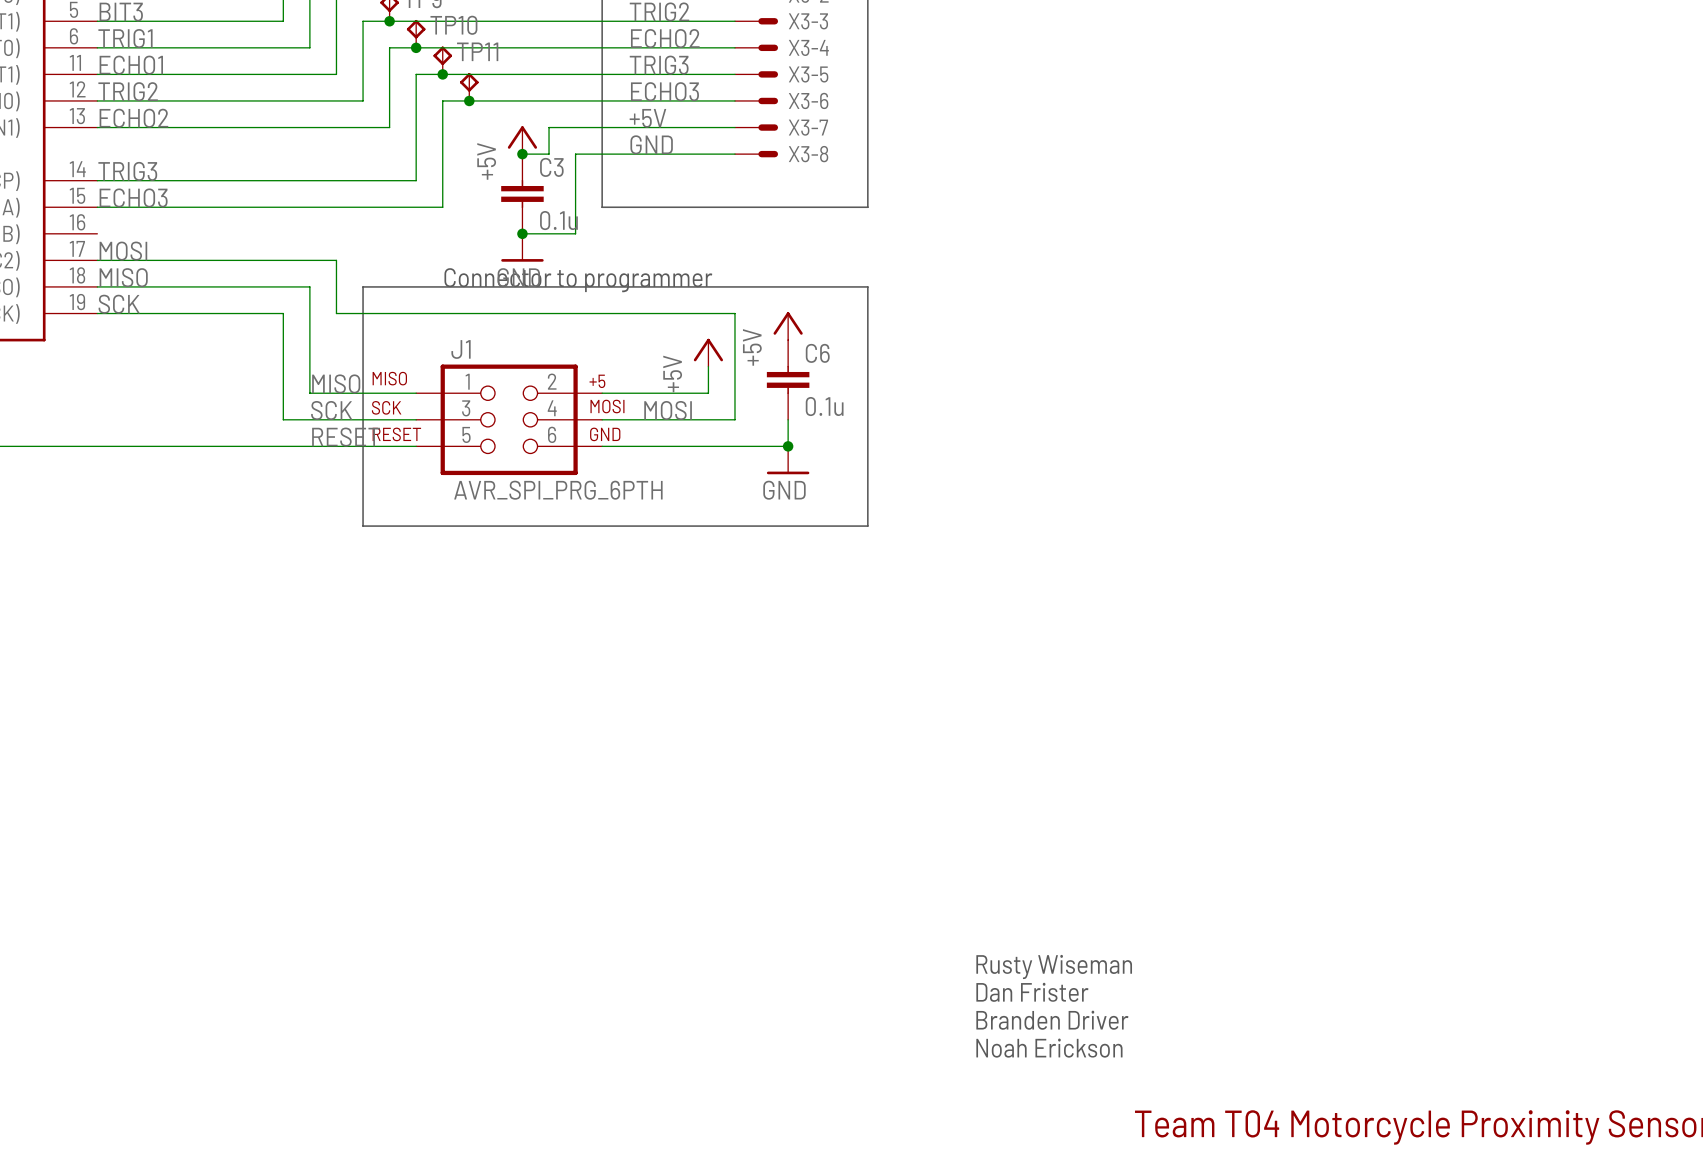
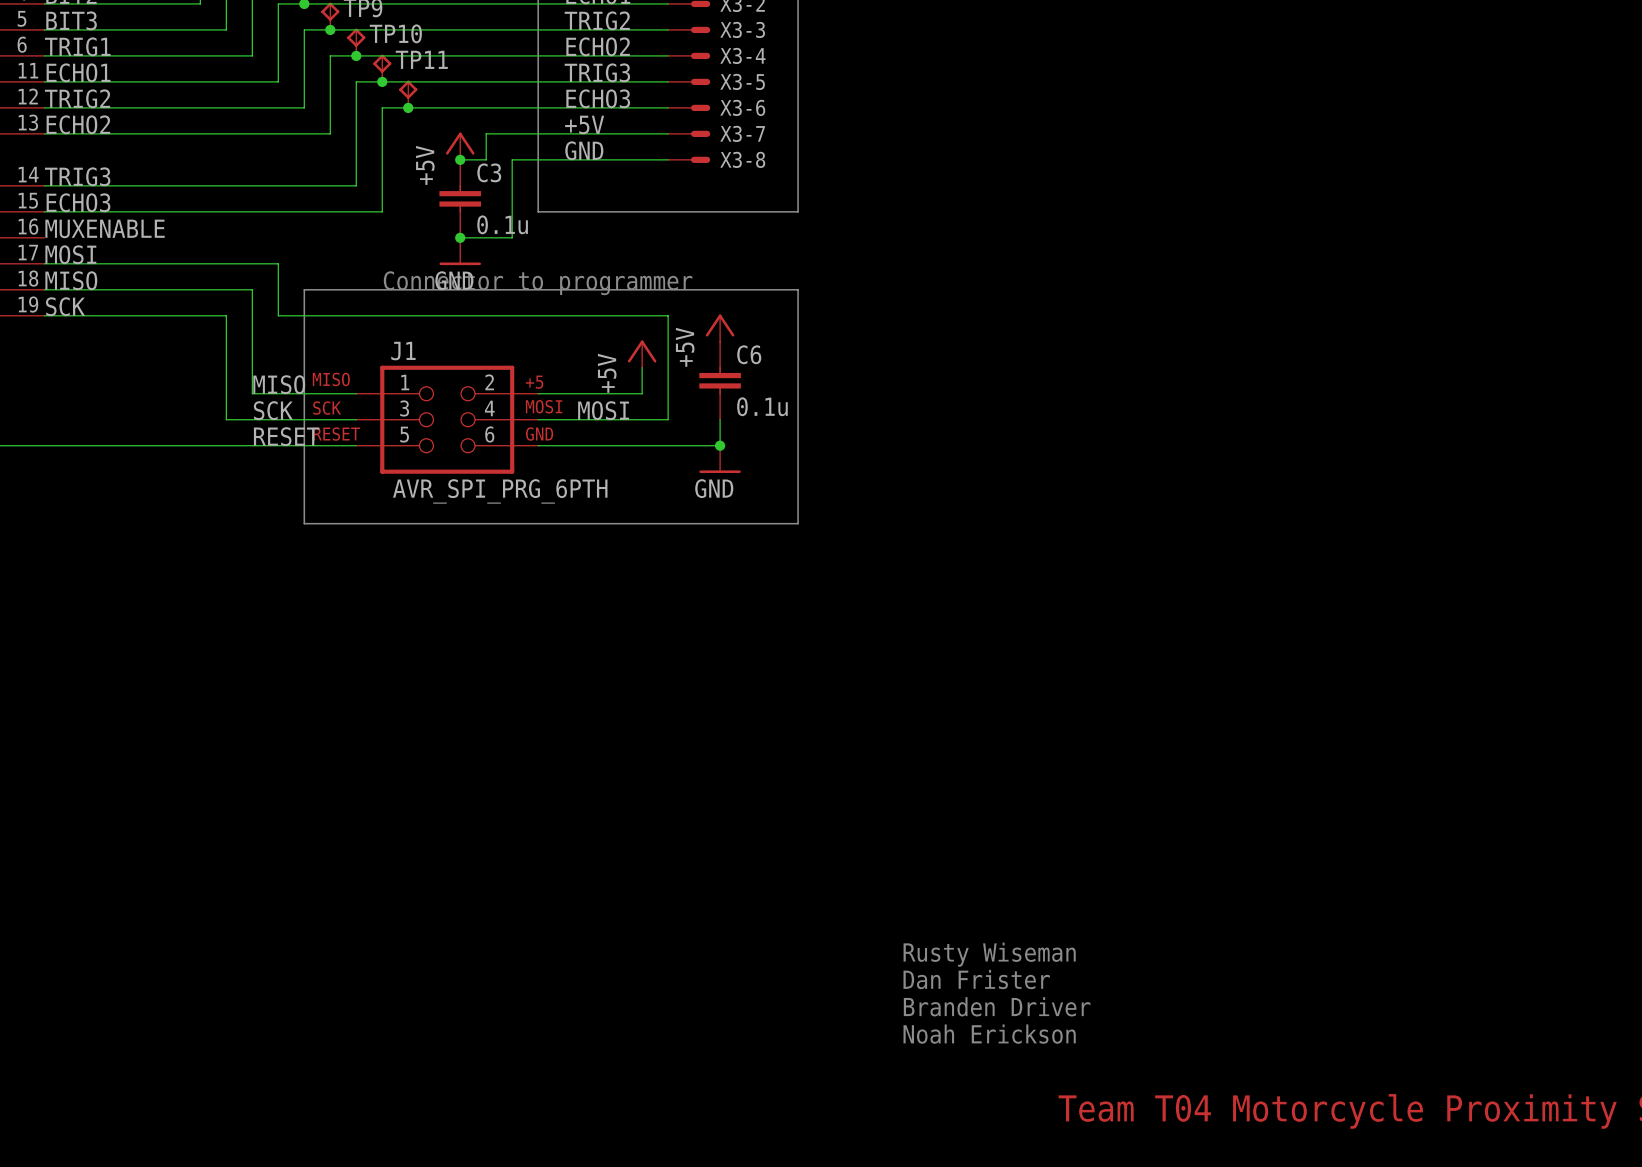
label: none -> MUXENABLE (105, 228)

